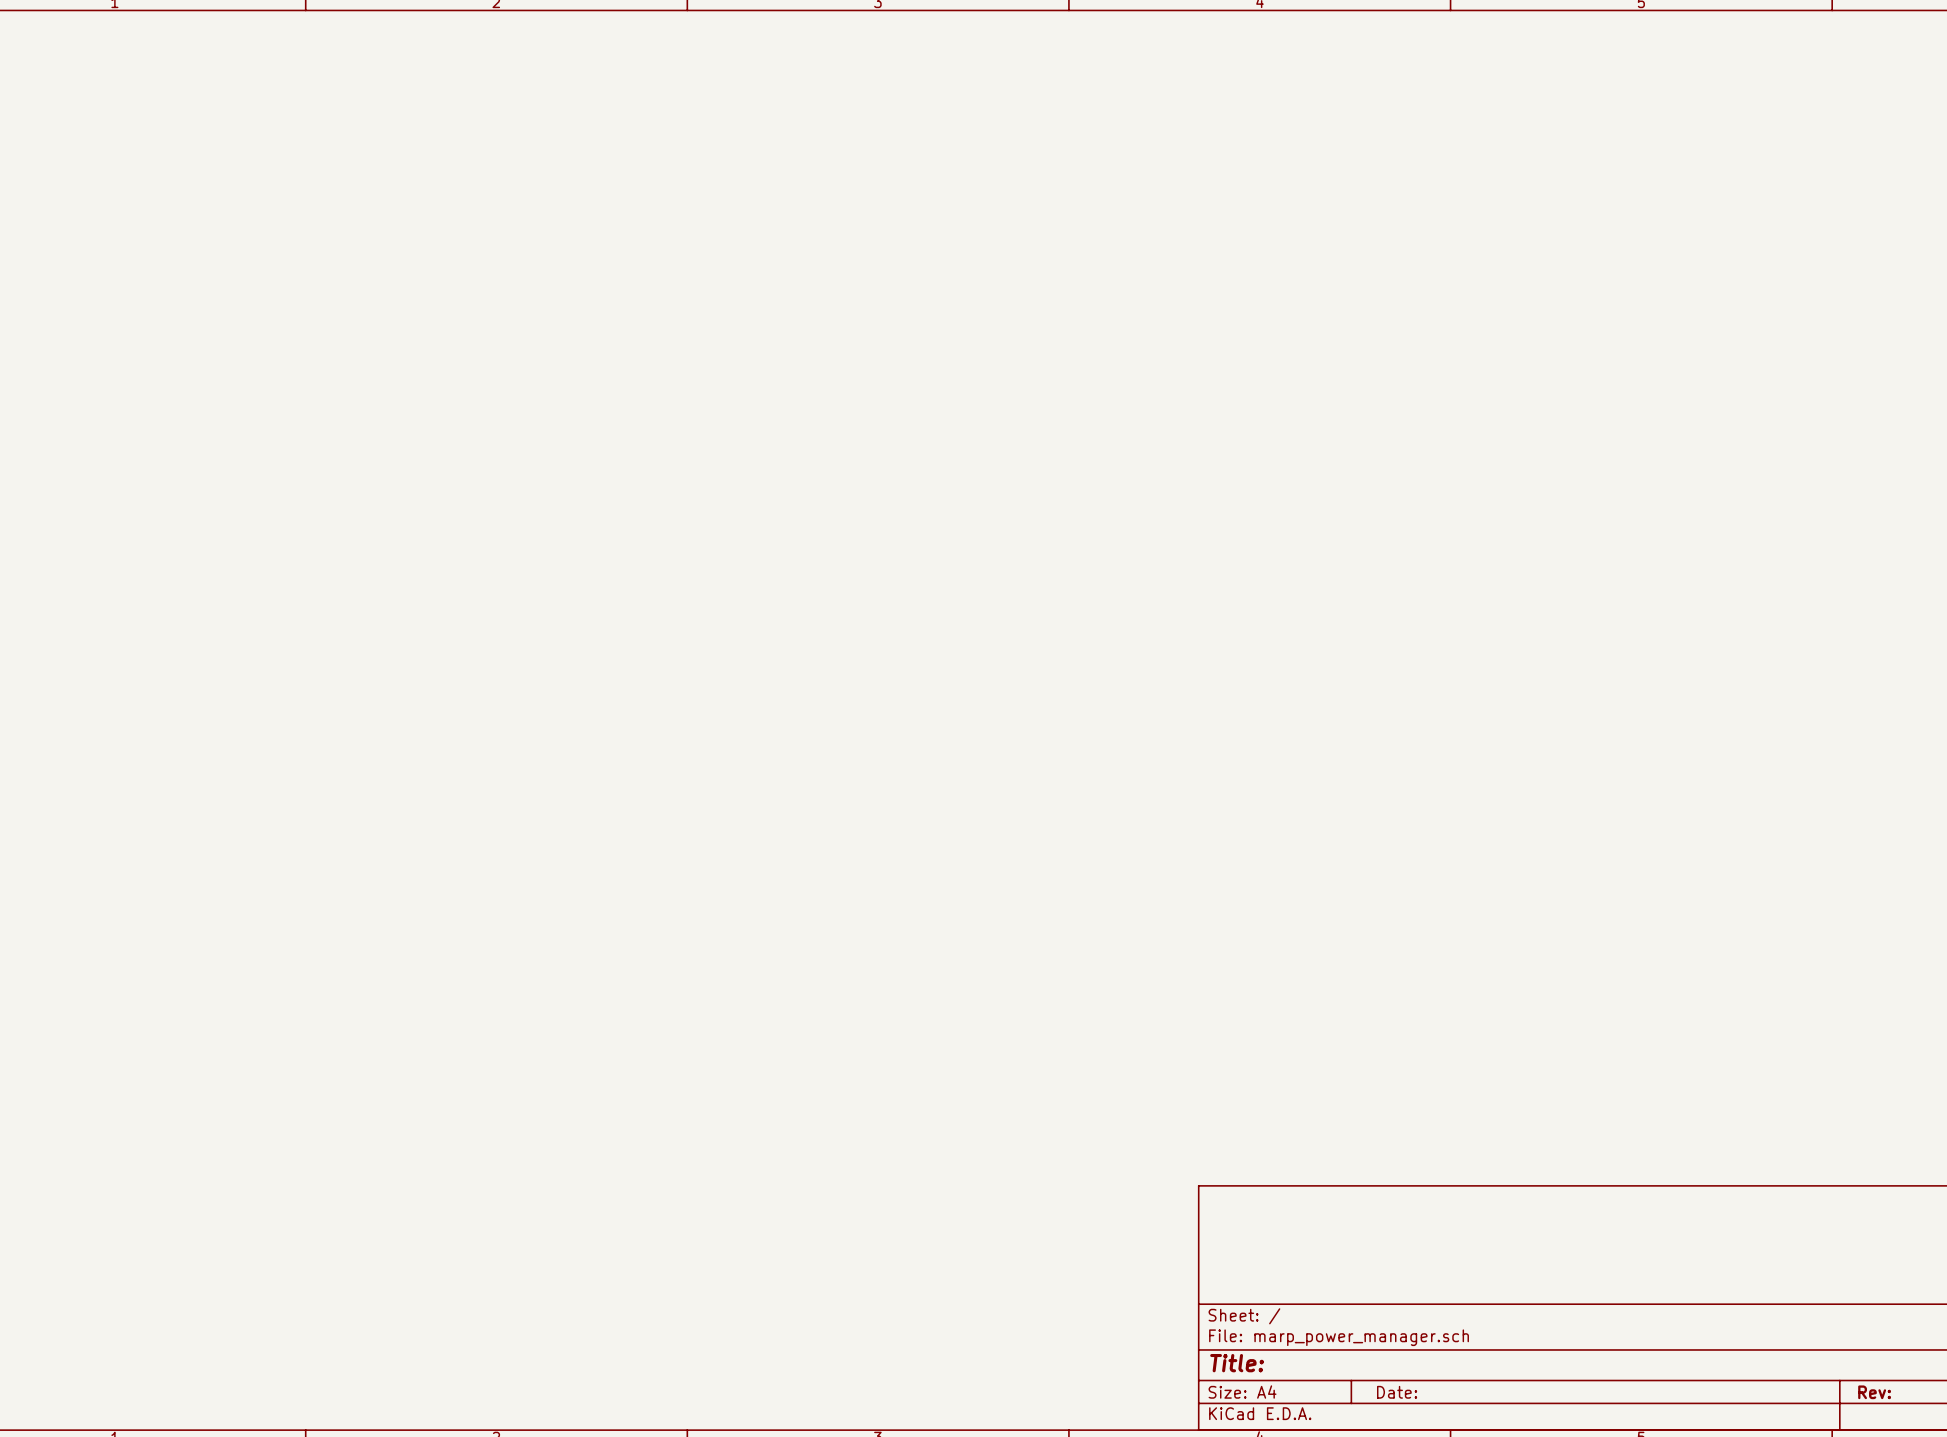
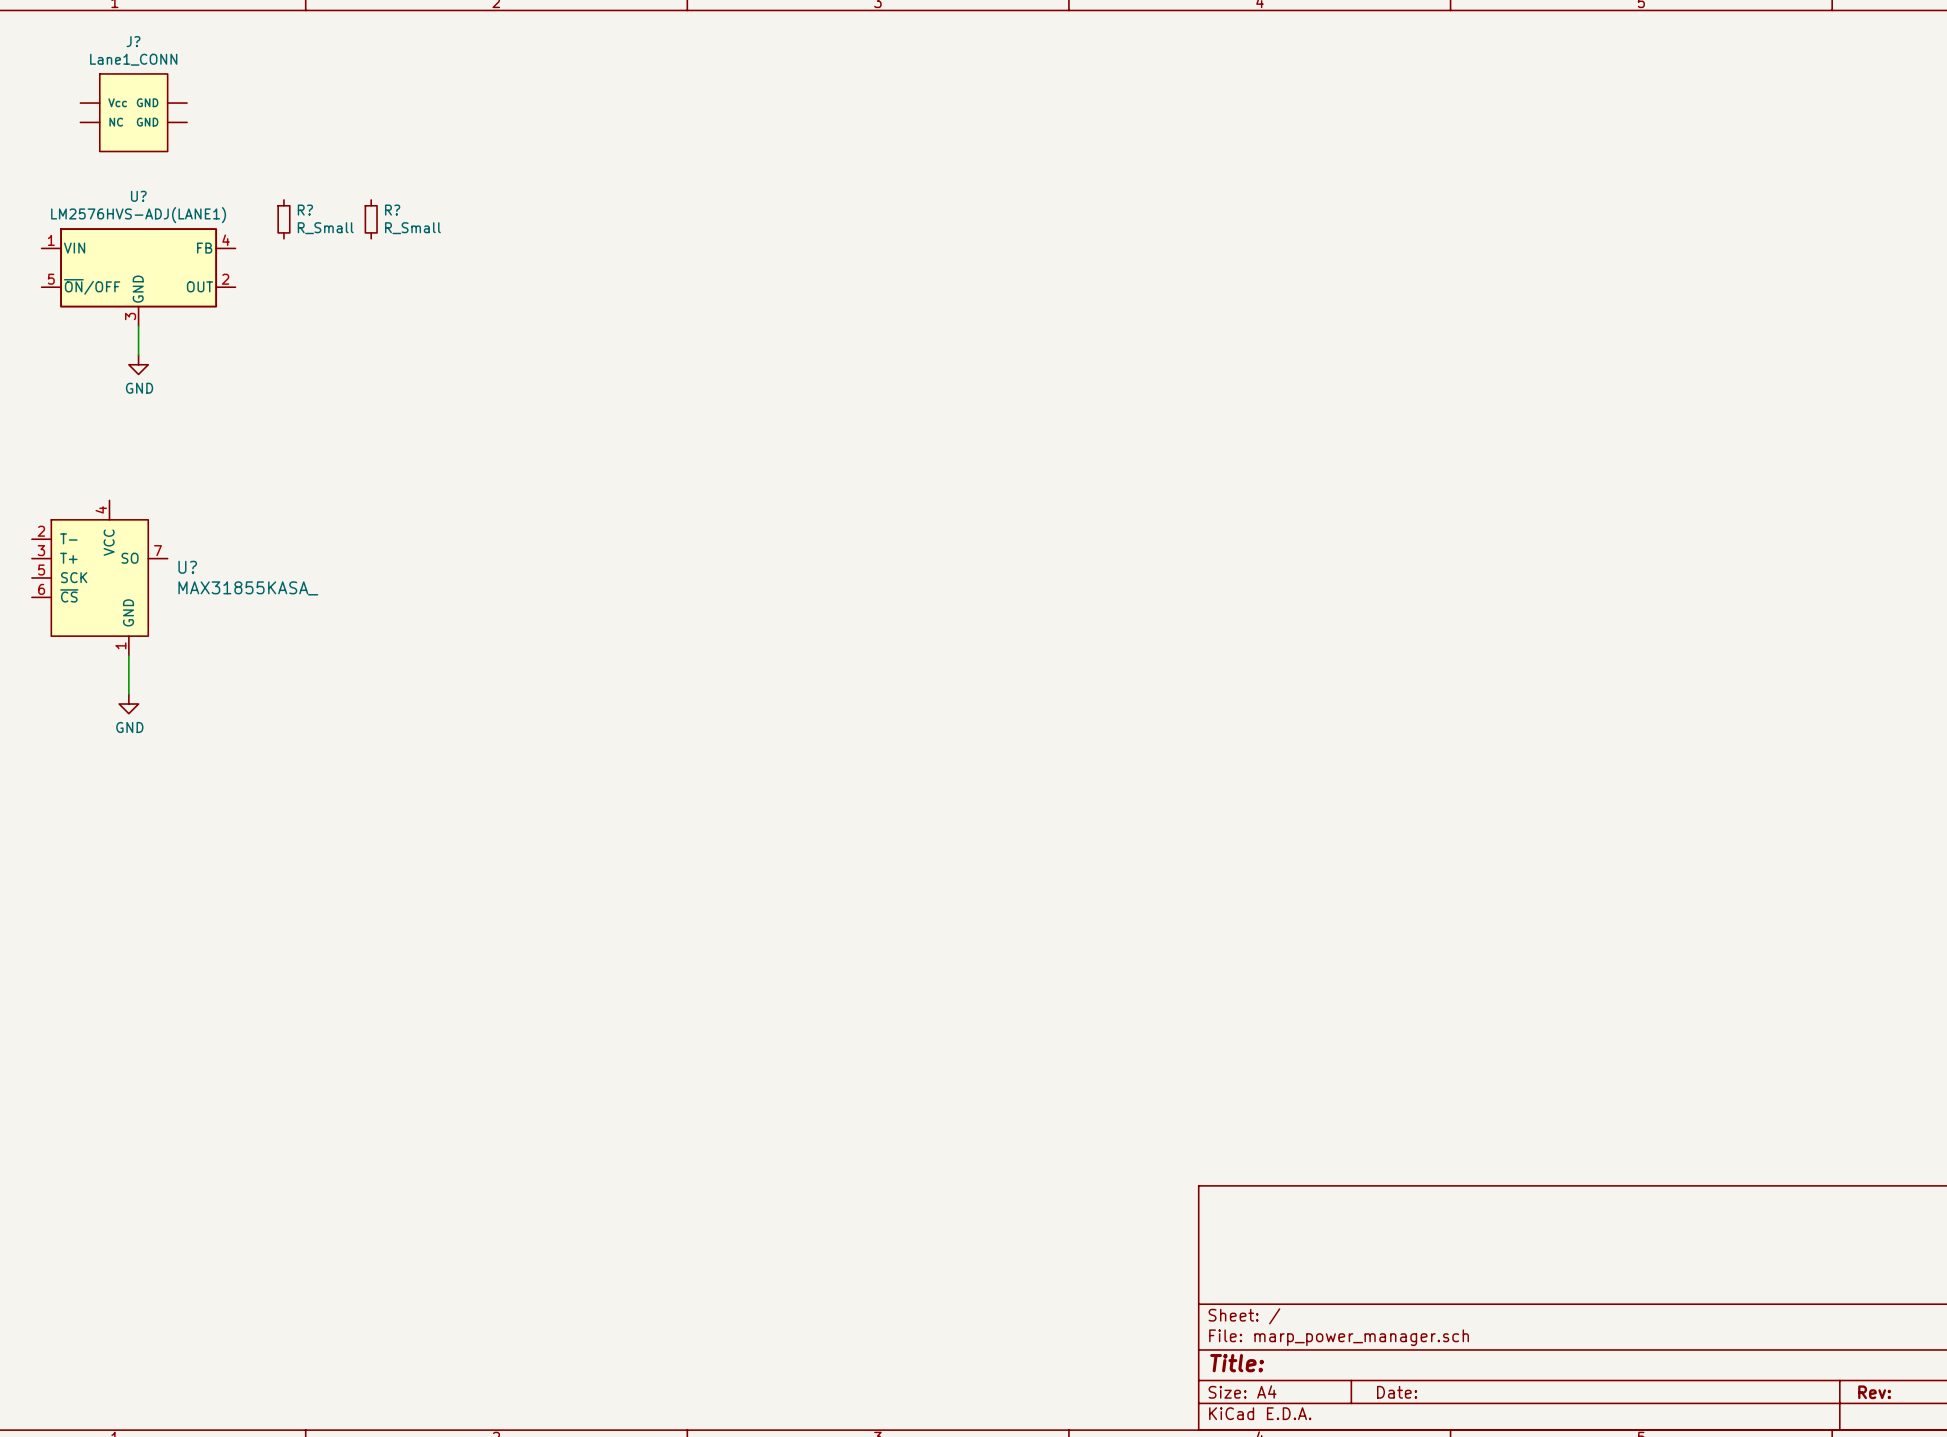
J?: none -> Lane1_CONN (133, 112)
R?: none -> R_Small (283, 219)
R?: none -> R_Small (371, 219)
U?: none -> LM2576HVS-ADJ(LANE1) (138, 277)
wire: none -> (138, 325) (138, 355)
power symbol: none -> GND (138, 364)
U?: none -> MAX31855KASA_ (99, 577)
wire: none -> (128, 655) (128, 694)
power symbol: none -> GND (128, 704)

